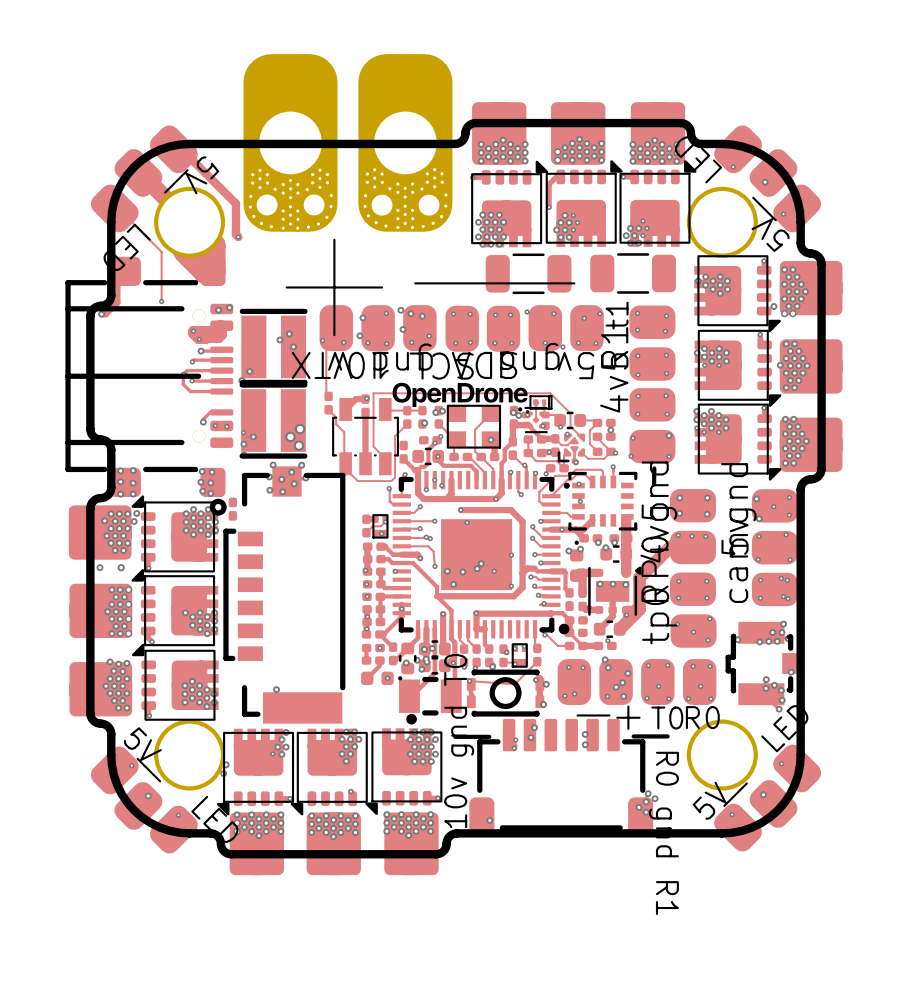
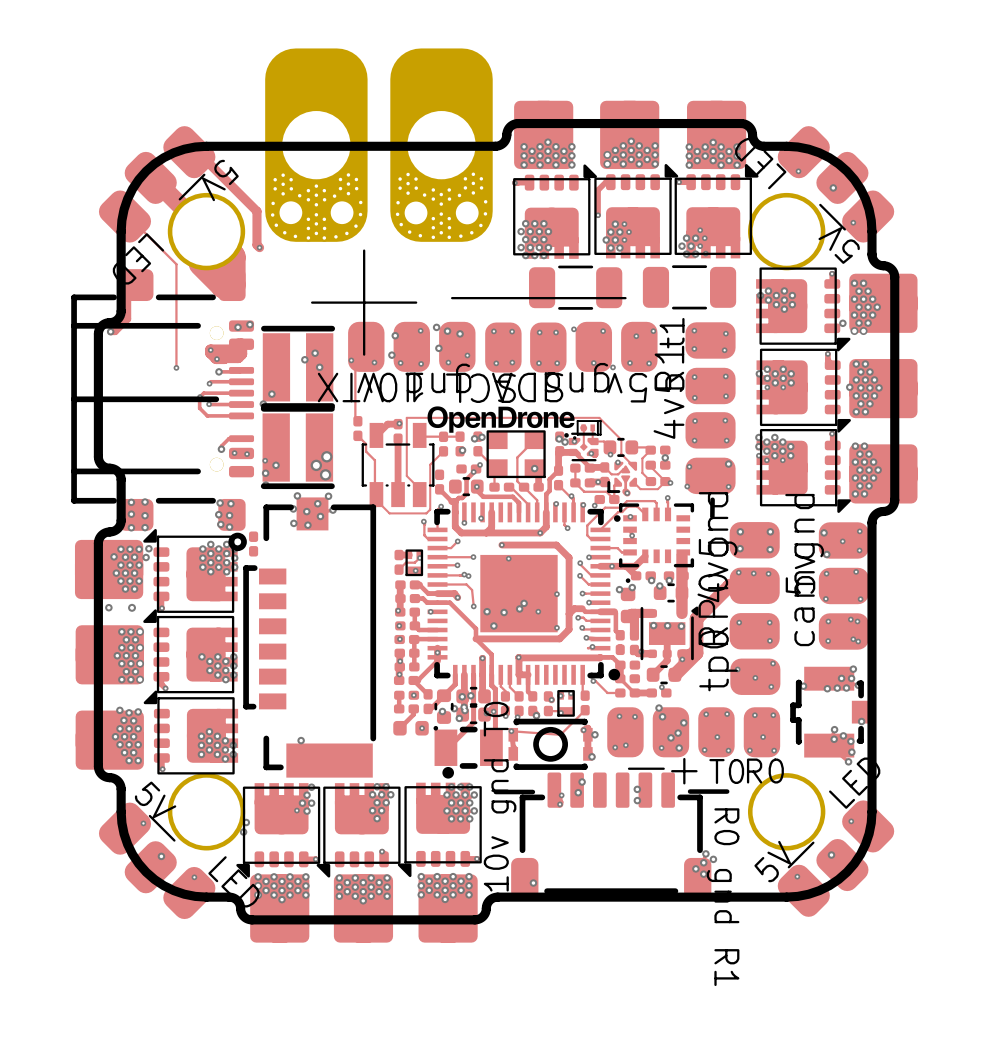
via: (647, 161) -> none
track: (161, 251) (161, 301) -> (175, 263) (176, 367)
via position: (161, 301) -> (176, 367)
via: (434, 480) -> none
via: (678, 598) -> none

